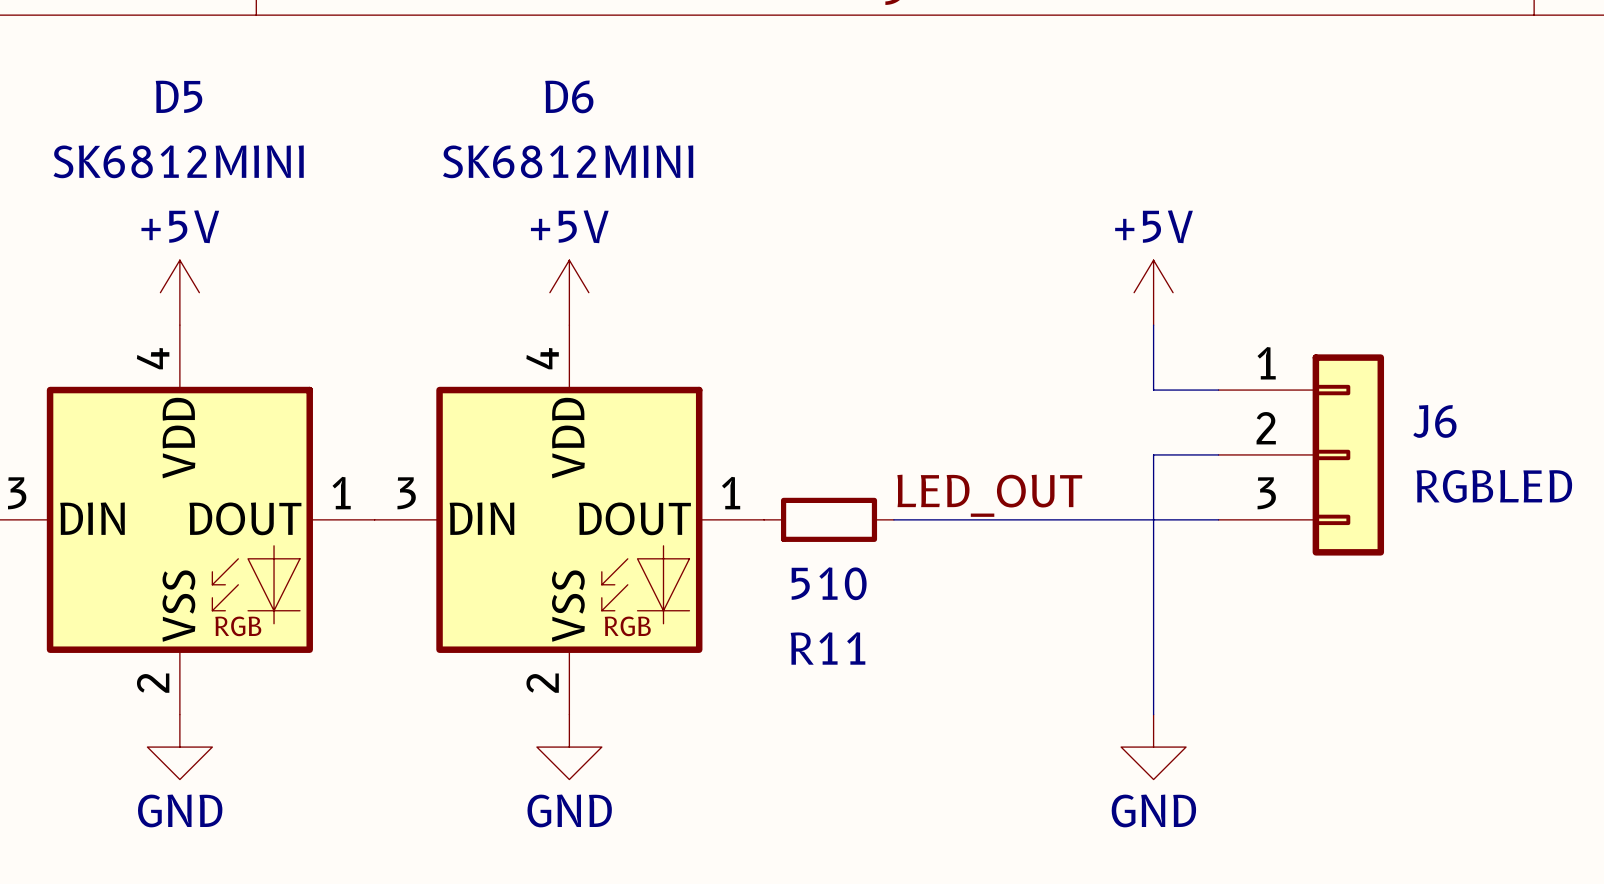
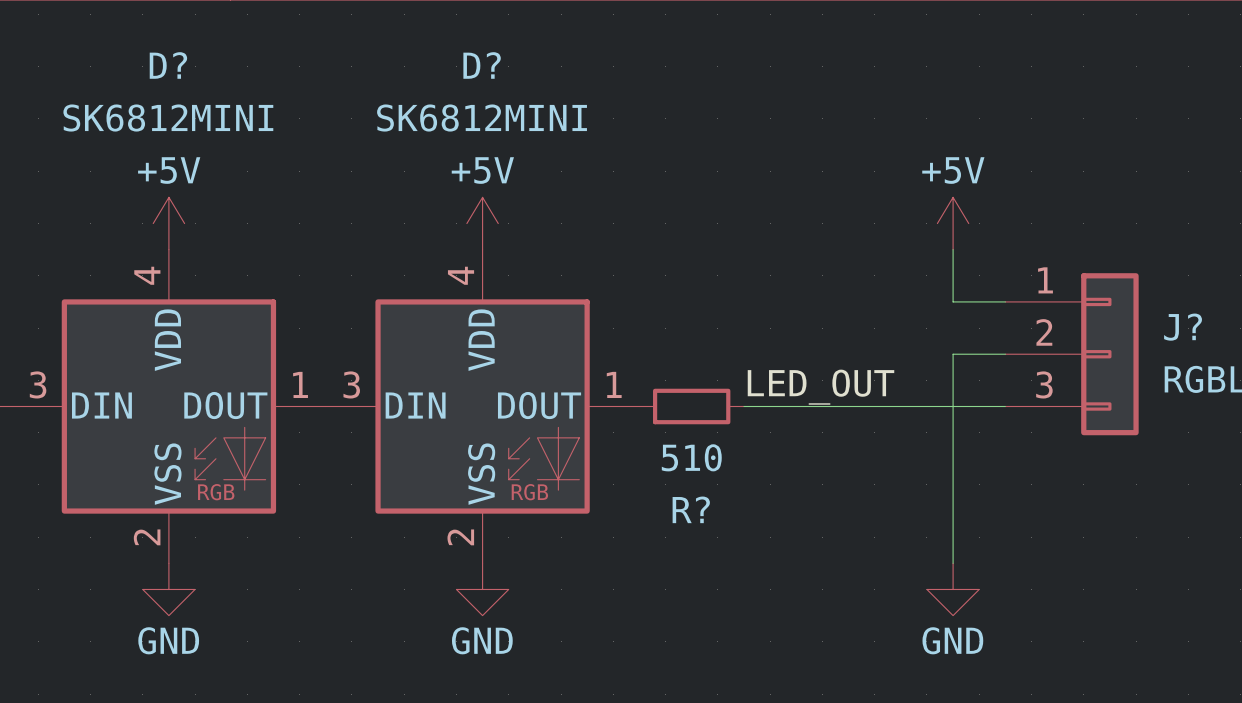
D5 name: D5 (179, 96) -> D? (168, 65)
D6 name: D6 (569, 96) -> D? (482, 65)
J6 name: J6 (1434, 421) -> J? (1183, 327)
R11 name: R11 (828, 648) -> R? (691, 509)

